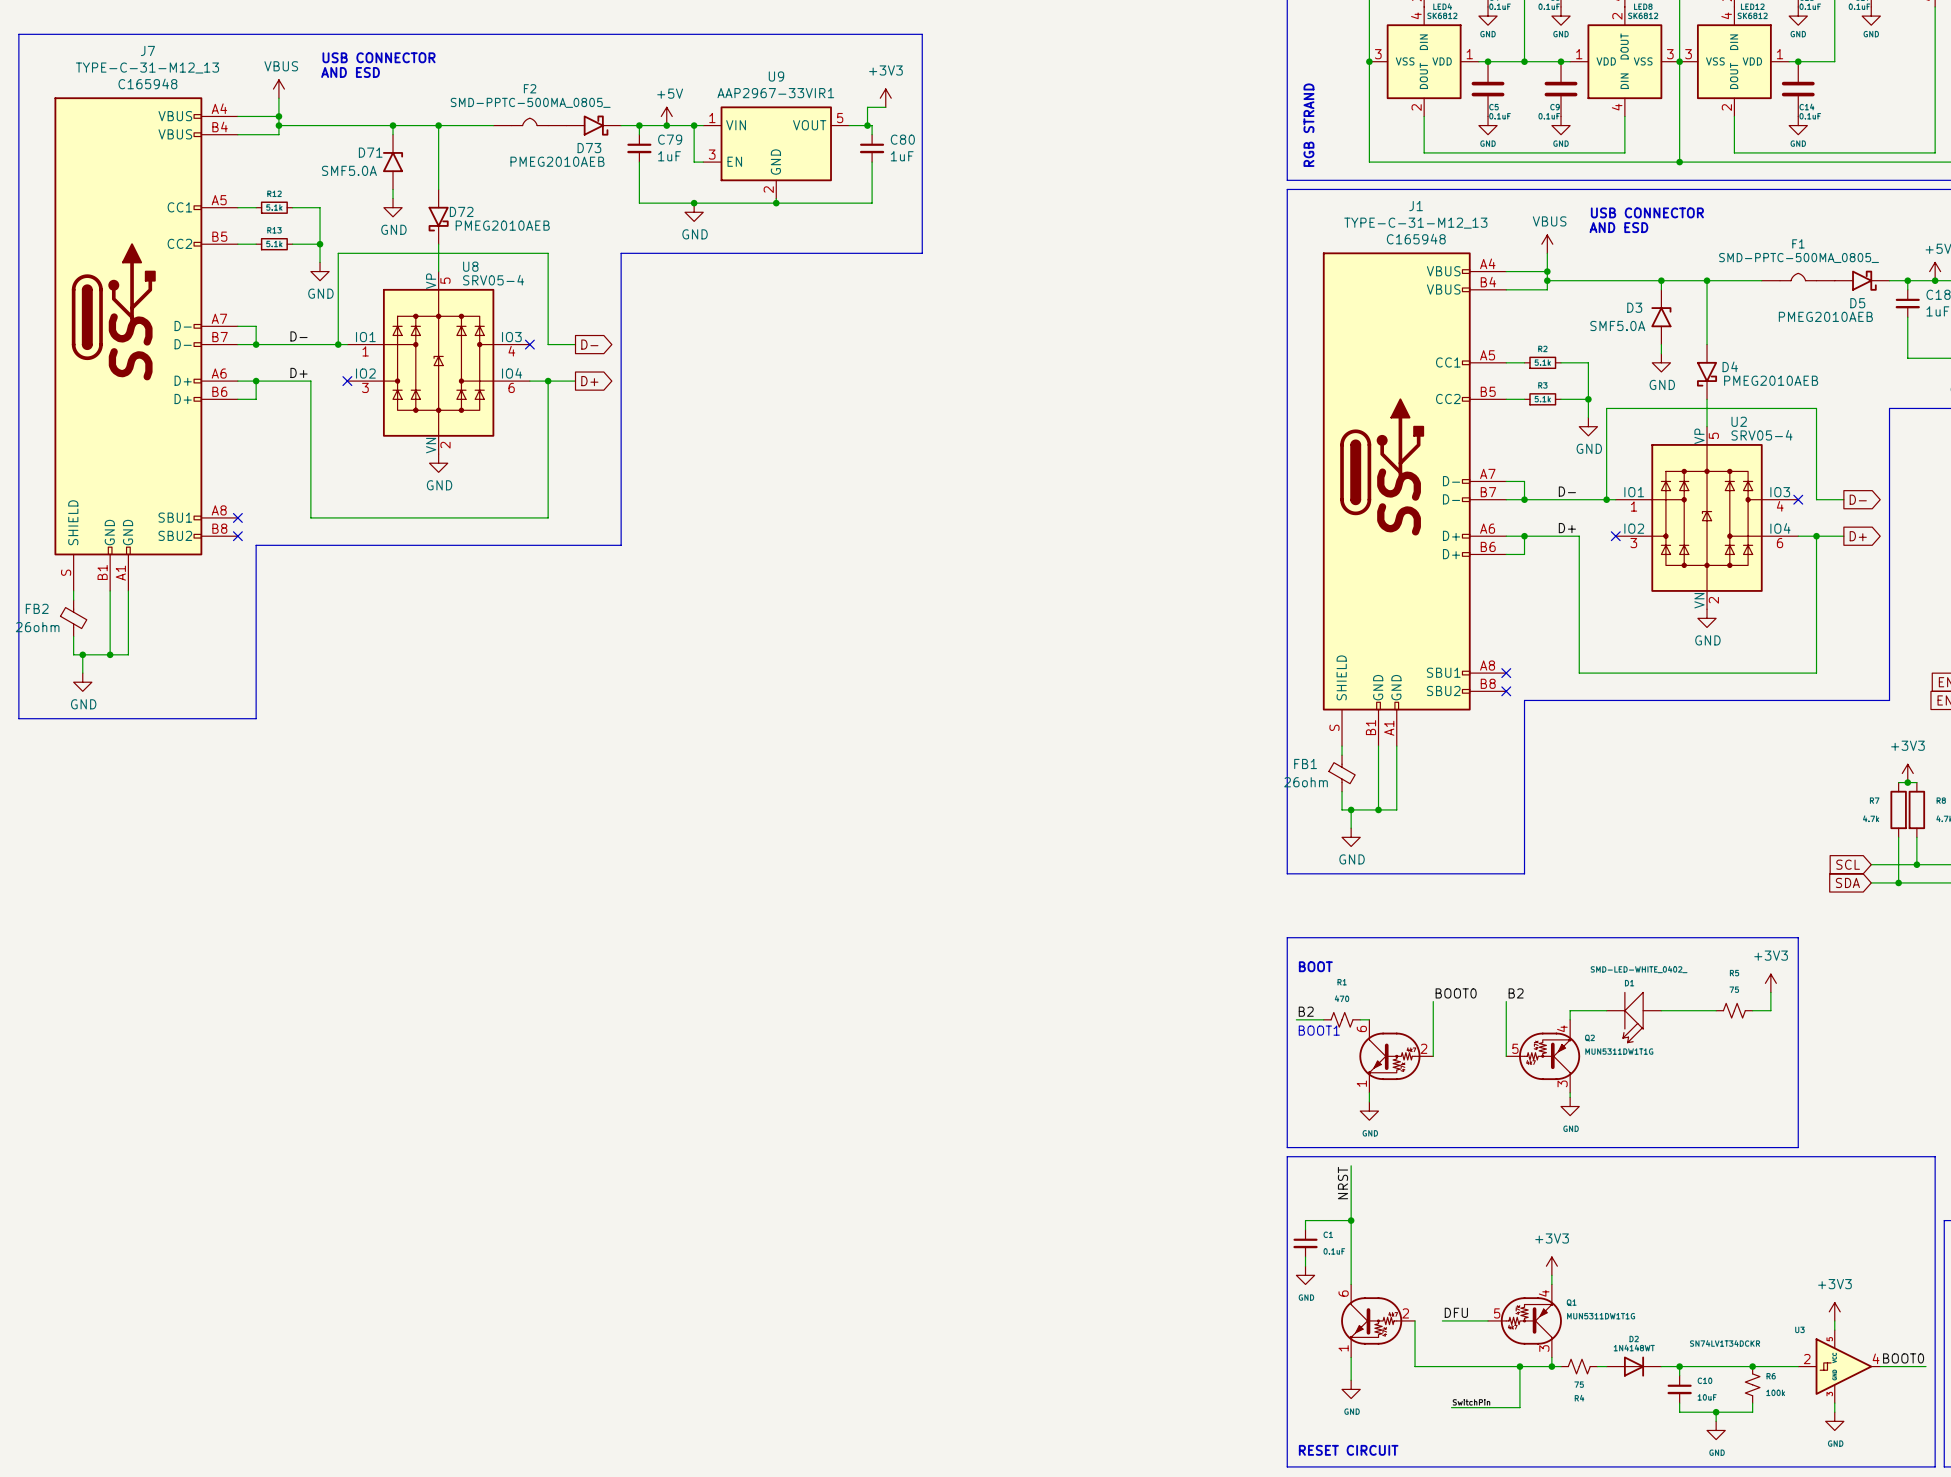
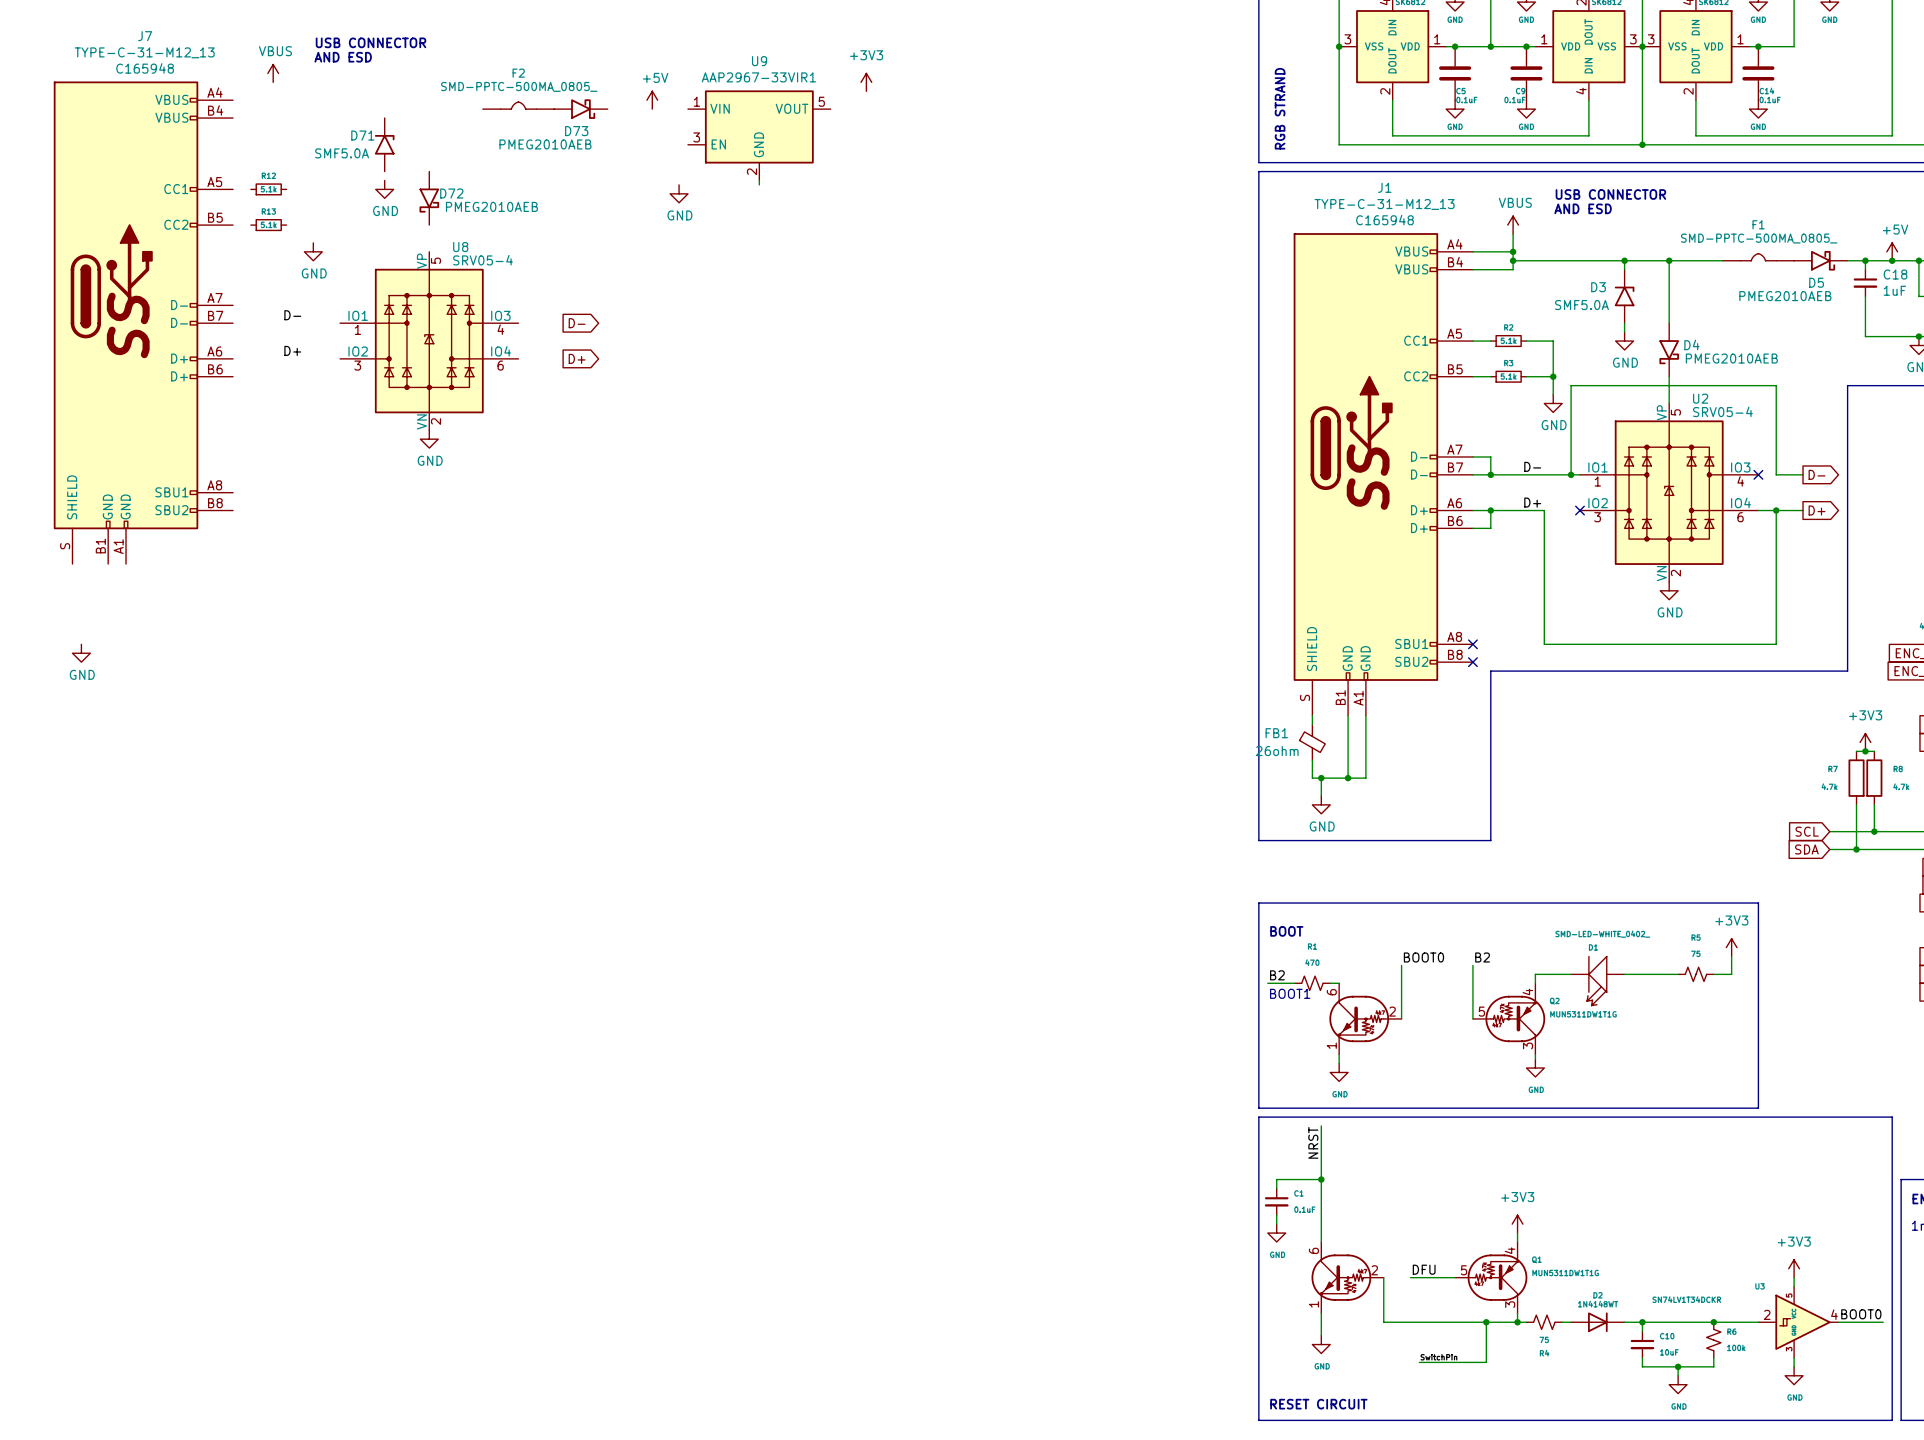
line: (18, 34) (18, 718) (256, 718) (256, 545) (621, 545) (621, 253) (922, 253) (922, 34) (18, 34) -> none
wire: (278, 98) (278, 134) (237, 134) -> none
wire: (885, 107) (867, 107) (867, 125) -> none
wire: (237, 116) (278, 116) -> none
junction: (278, 116) -> none
wire: (278, 125) (493, 125) -> none
junction: (278, 125) -> none
wire: (393, 125) (393, 134) -> none
junction: (393, 125) -> none
wire: (438, 125) (438, 189) -> none
junction: (438, 125) -> none
wire: (621, 125) (703, 125) -> none
wire: (639, 125) (639, 134) -> none
junction: (639, 125) -> none
junction: (666, 125) -> none
wire: (694, 125) (694, 162) (703, 162) -> none
junction: (694, 125) -> none
wire: (849, 125) (872, 125) (872, 134) -> none
junction: (867, 125) -> none
C79: (639, 148) -> none
C80: (872, 148) -> none
wire: (639, 162) (639, 203) (872, 203) (872, 162) -> none
wire: (393, 189) (393, 198) -> none
junction: (694, 203) -> none
junction: (776, 203) -> none
wire: (237, 207) (256, 207) -> none
wire: (292, 207) (320, 207) (320, 262) -> none
wire: (237, 244) (256, 244) -> none
wire: (292, 244) (320, 244) -> none
junction: (320, 244) -> none
wire: (438, 244) (438, 271) -> none
wire: (237, 326) (256, 326) (256, 344) -> none
wire: (237, 344) (347, 344) -> none
junction: (256, 344) -> none
wire: (338, 344) (338, 253) (548, 253) (548, 344) (575, 344) -> none
junction: (338, 344) -> none
no-connect mark: (529, 344) -> none
wire: (237, 381) (310, 381) (310, 517) (548, 517) (548, 381) -> none
wire: (256, 381) (256, 399) (237, 399) -> none
junction: (256, 381) -> none
no-connect mark: (347, 381) -> none
wire: (529, 381) (575, 381) -> none
junction: (548, 381) -> none
no-connect mark: (237, 517) -> none
no-connect mark: (237, 536) -> none
wire: (73, 590) (73, 600) -> none
wire: (110, 590) (110, 654) -> none
wire: (128, 590) (128, 654) (73, 654) (73, 636) -> none
FB2: (73, 618) -> none
wire: (82, 654) (82, 673) -> none
junction: (82, 654) -> none
junction: (110, 654) -> none

